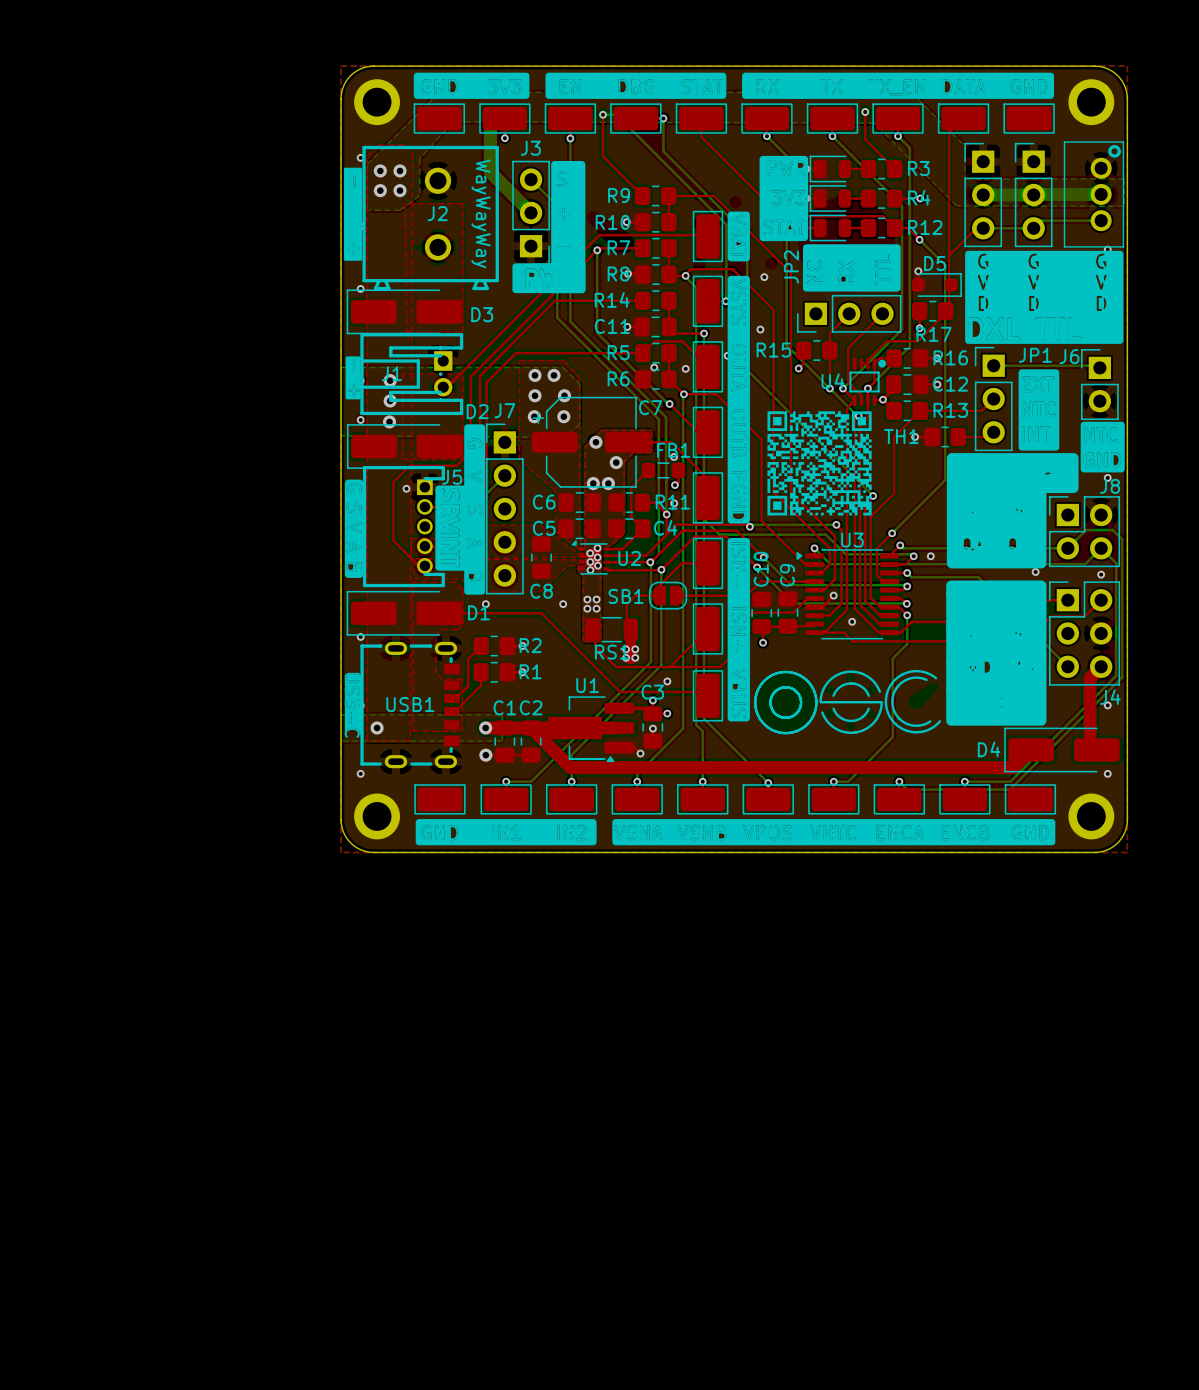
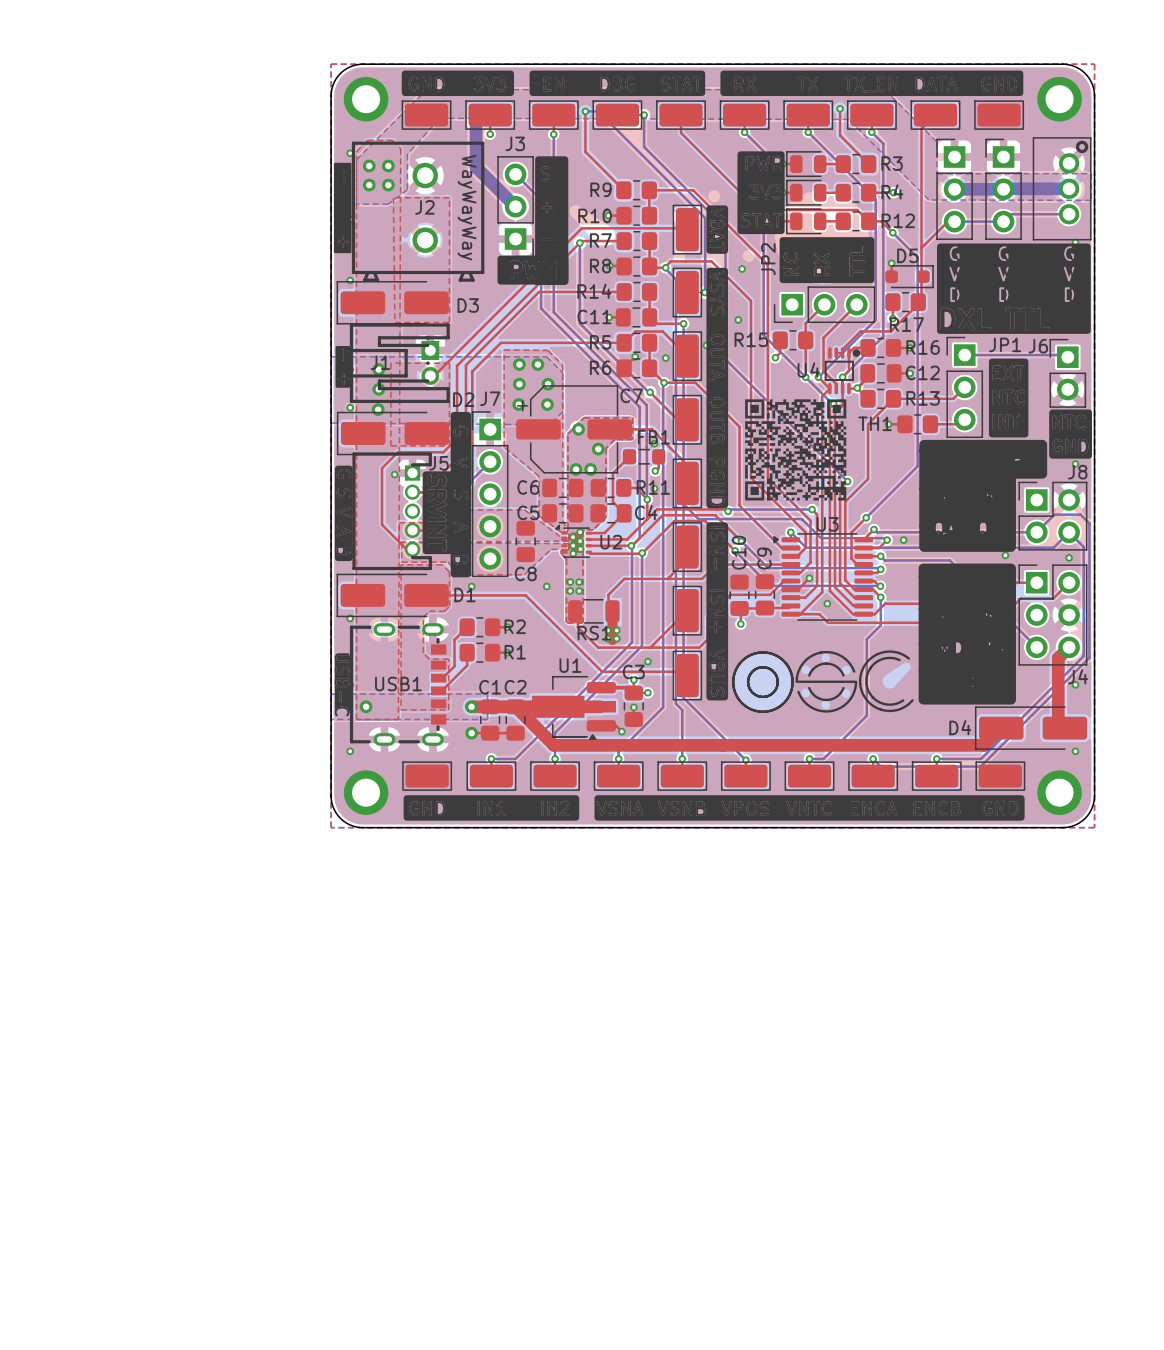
top track: (707, 563) (681, 563) (659, 585) (659, 595) -> none
top track: none -> (687, 559) (667, 578)
top track: (760, 581) (746, 595) (671, 595) -> (738, 564) (716, 564) (702, 578) (624, 578) (608, 594)
top track: (654, 595) (635, 595) (626, 604) (626, 612) -> none
SB1: (668, 595) -> none

